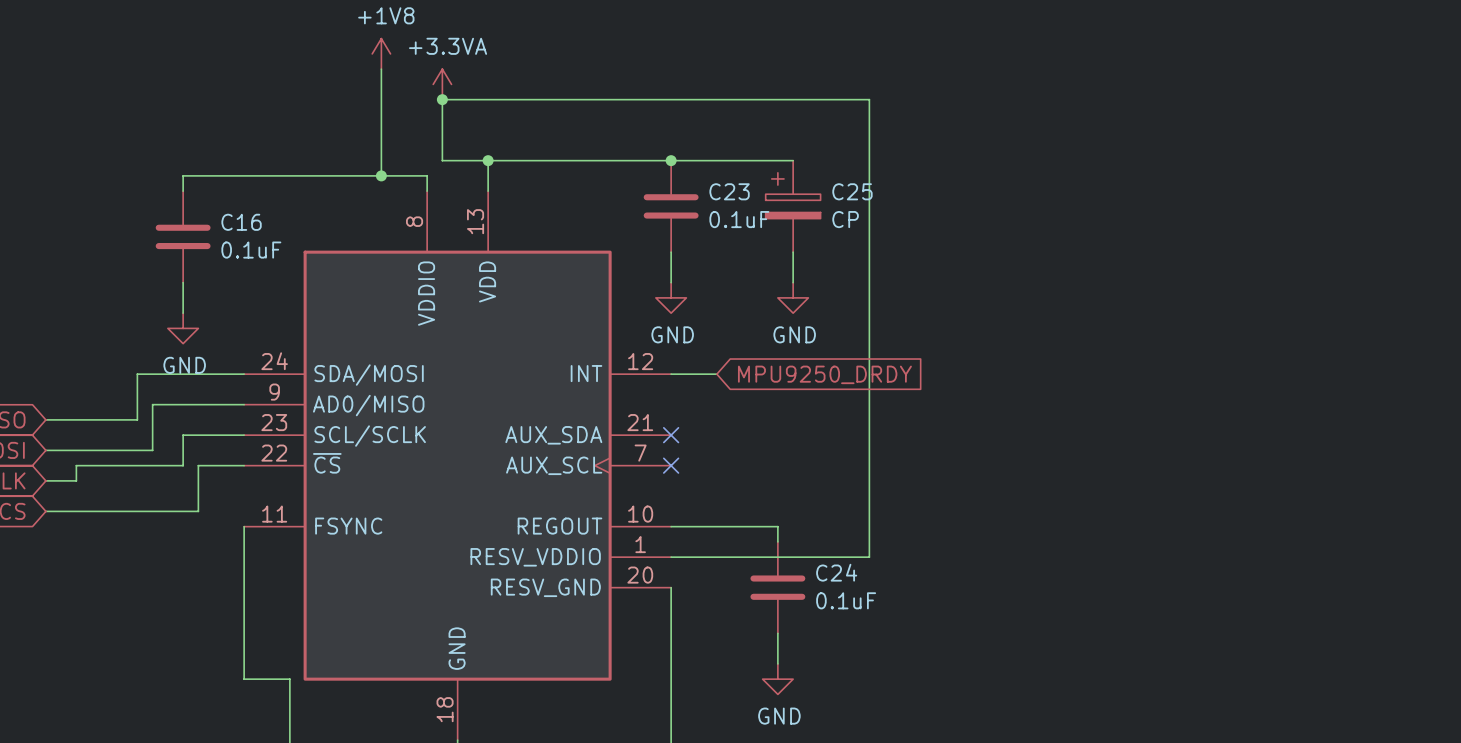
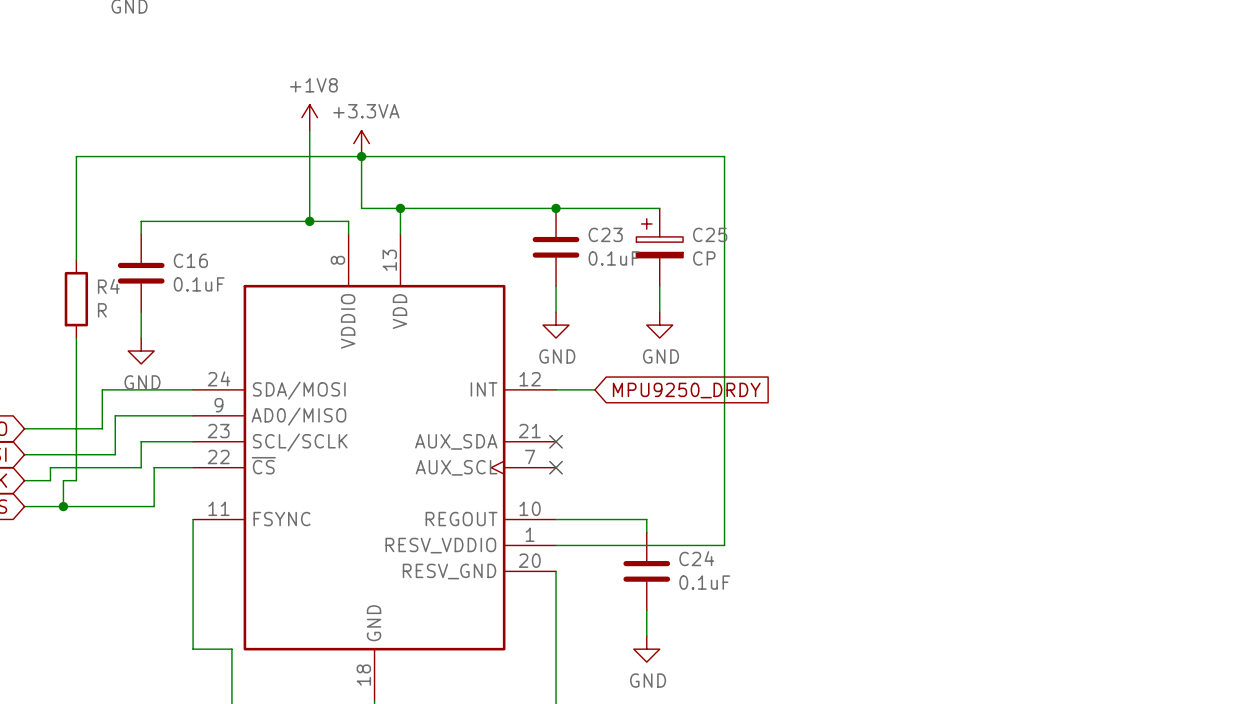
wire: none -> (361, 156) (76, 156) (76, 260)
R4: none -> R (76, 299)
wire: none -> (76, 338) (76, 480) (63, 480) (63, 506)
junction: none -> (63, 506)

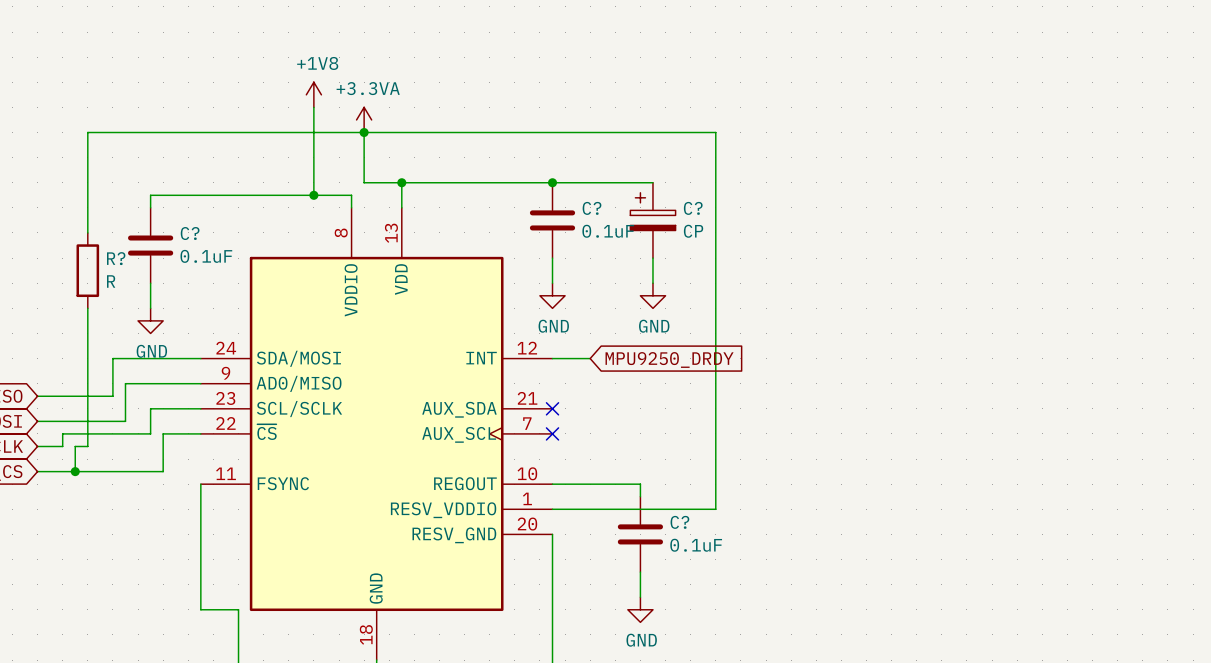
C23 name: C23 (605, 234) -> C? (592, 208)
C25 name: C25 (710, 234) -> C? (693, 208)
C16 name: C16 (190, 260) -> C? (190, 233)
R4 name: R4 (108, 286) -> R? (116, 258)
C24 name: C24 (696, 558) -> C? (679, 522)

